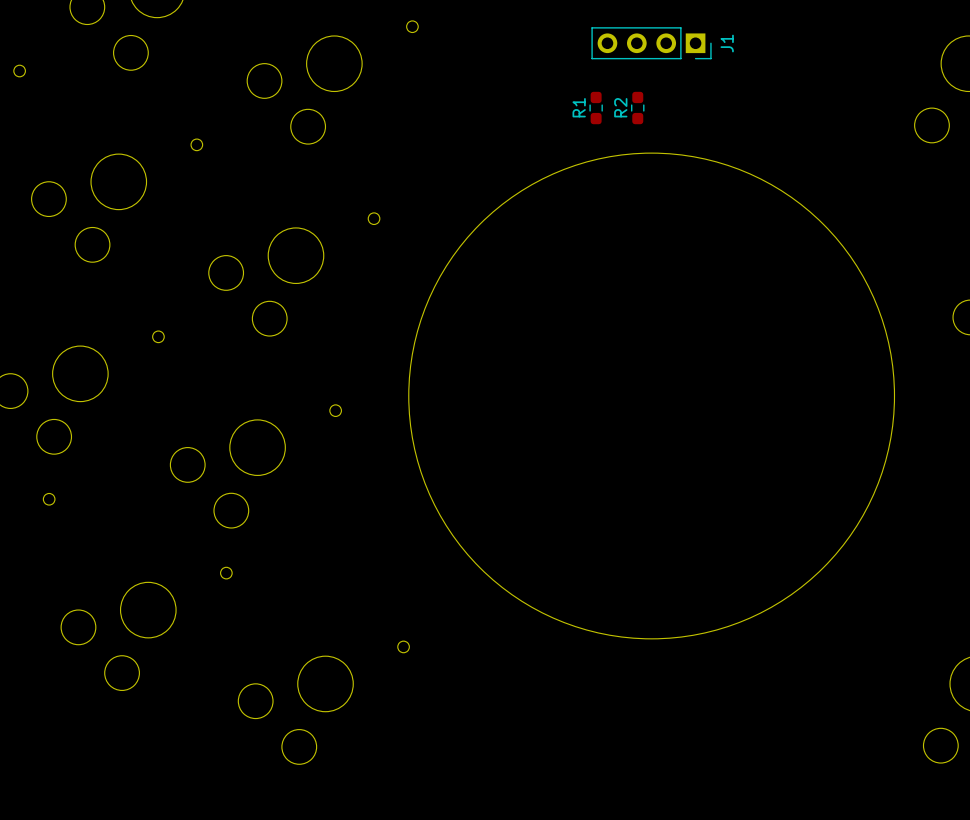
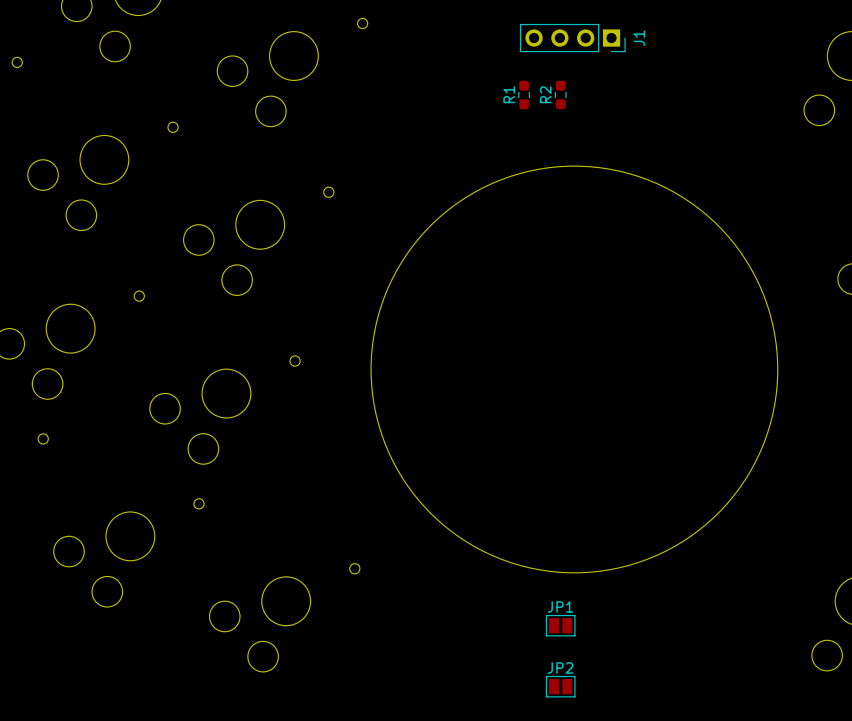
round board edge: [408, 152, 895, 640] -> none
round board edge: none -> [370, 165, 779, 574]
JP1: none -> (560, 625)
JP2: none -> (560, 686)

